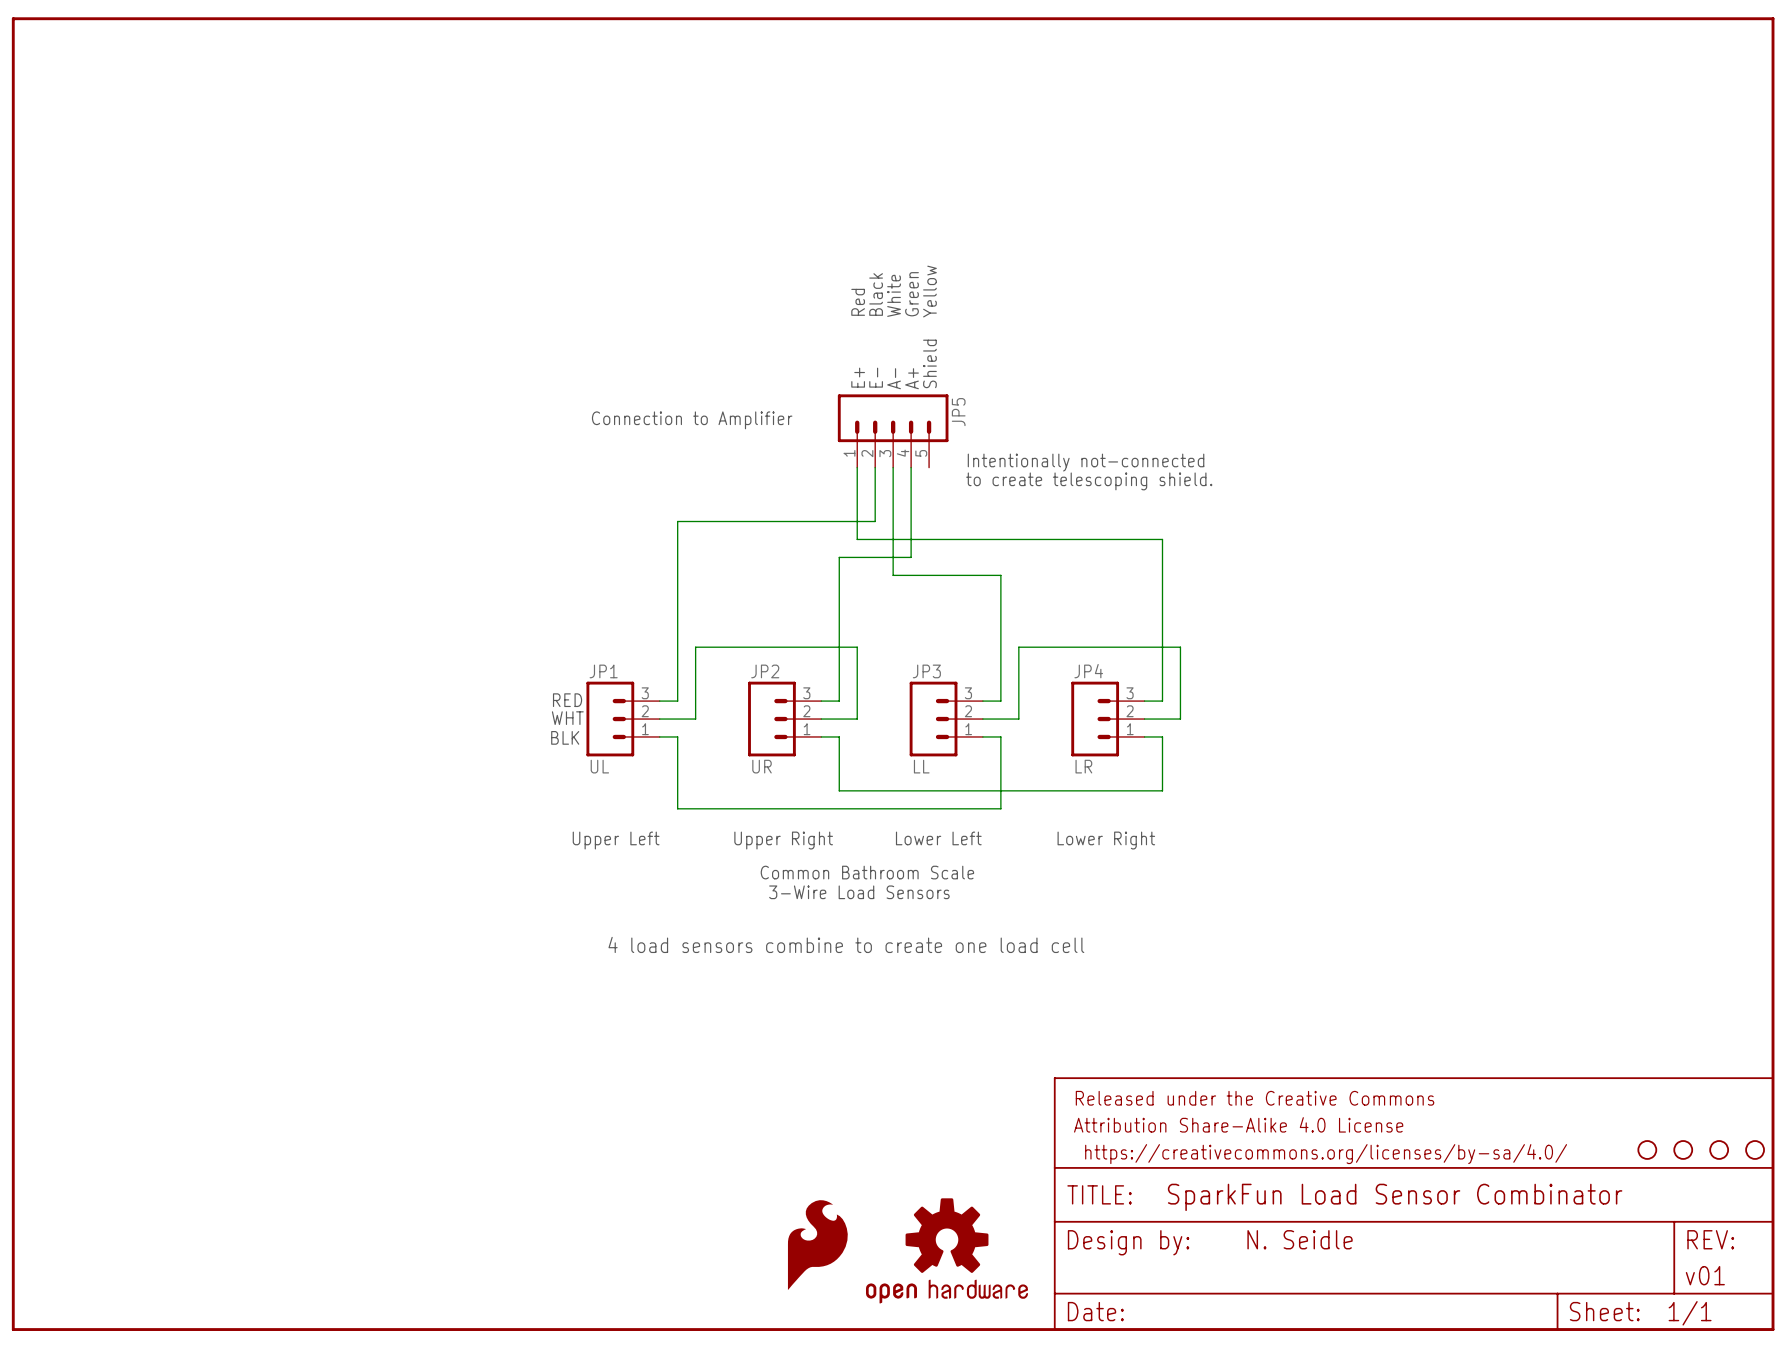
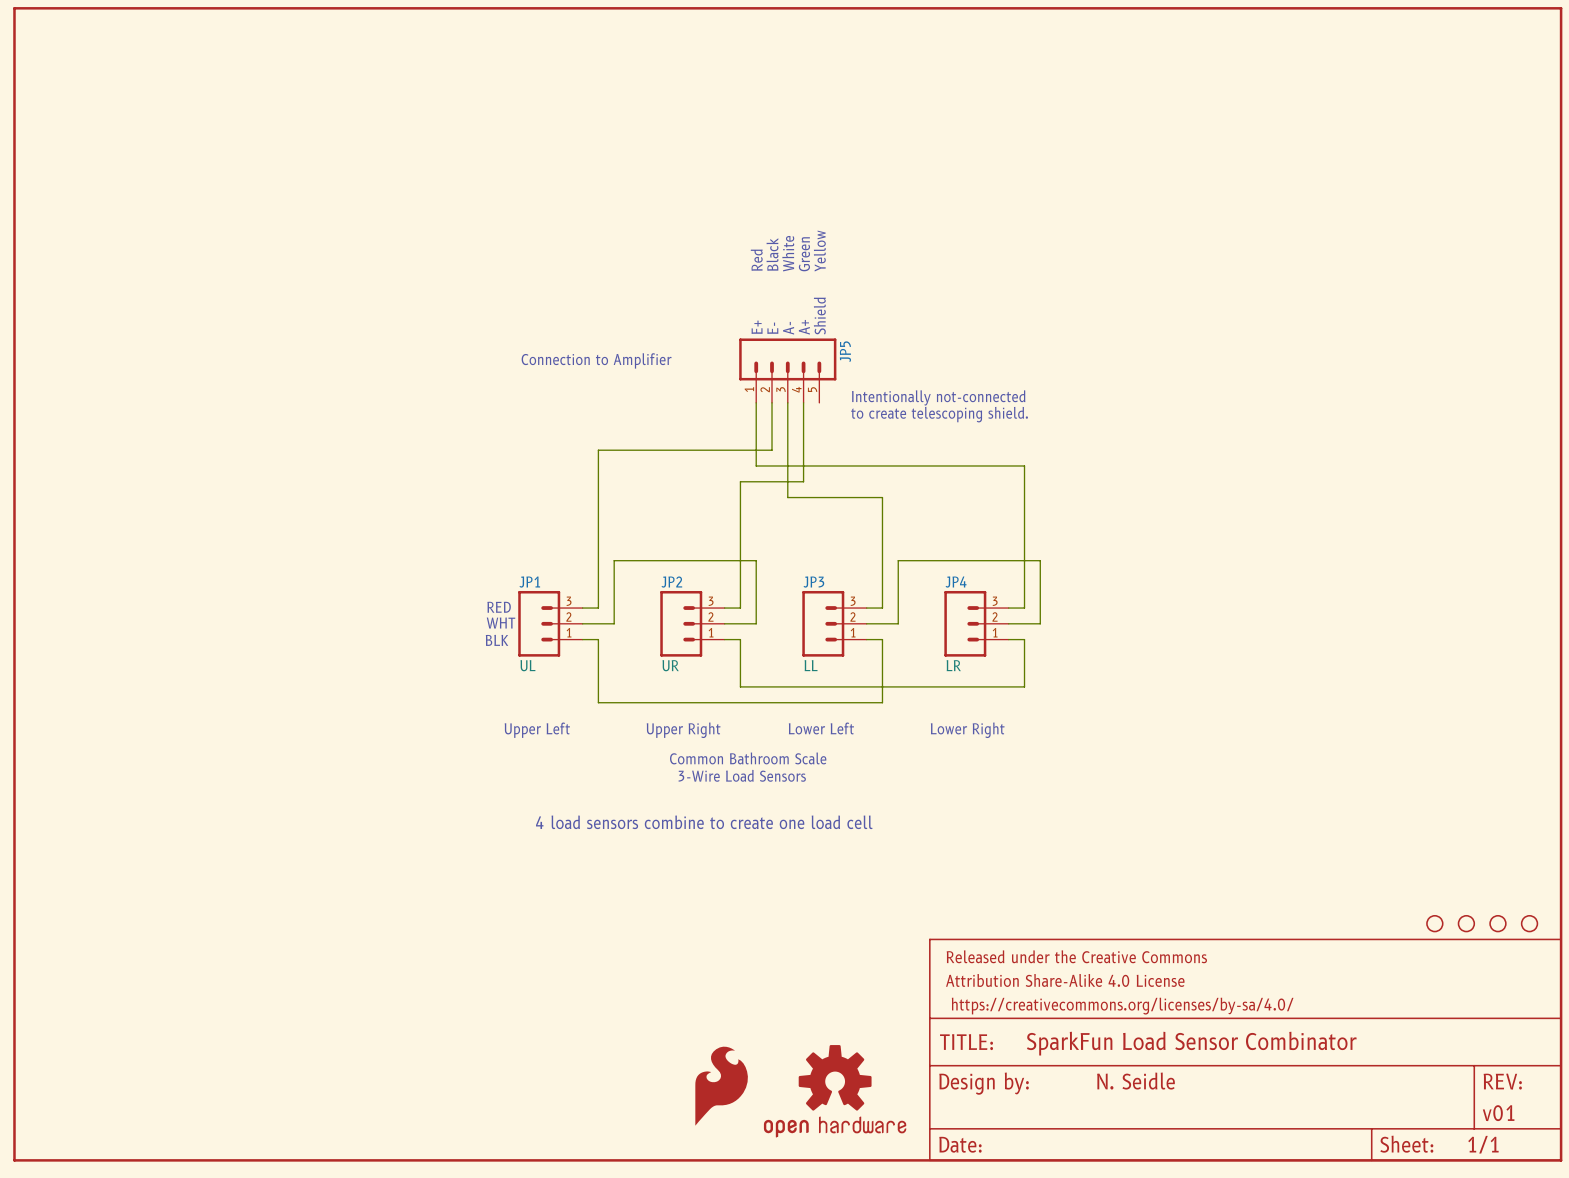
part: none -> (1434, 923)
part: none -> (1466, 923)
part: none -> (1497, 923)
part: none -> (1529, 923)
part: (1647, 1149) -> none
part: (1683, 1149) -> none
part: (1719, 1149) -> none
part: (1755, 1149) -> none

